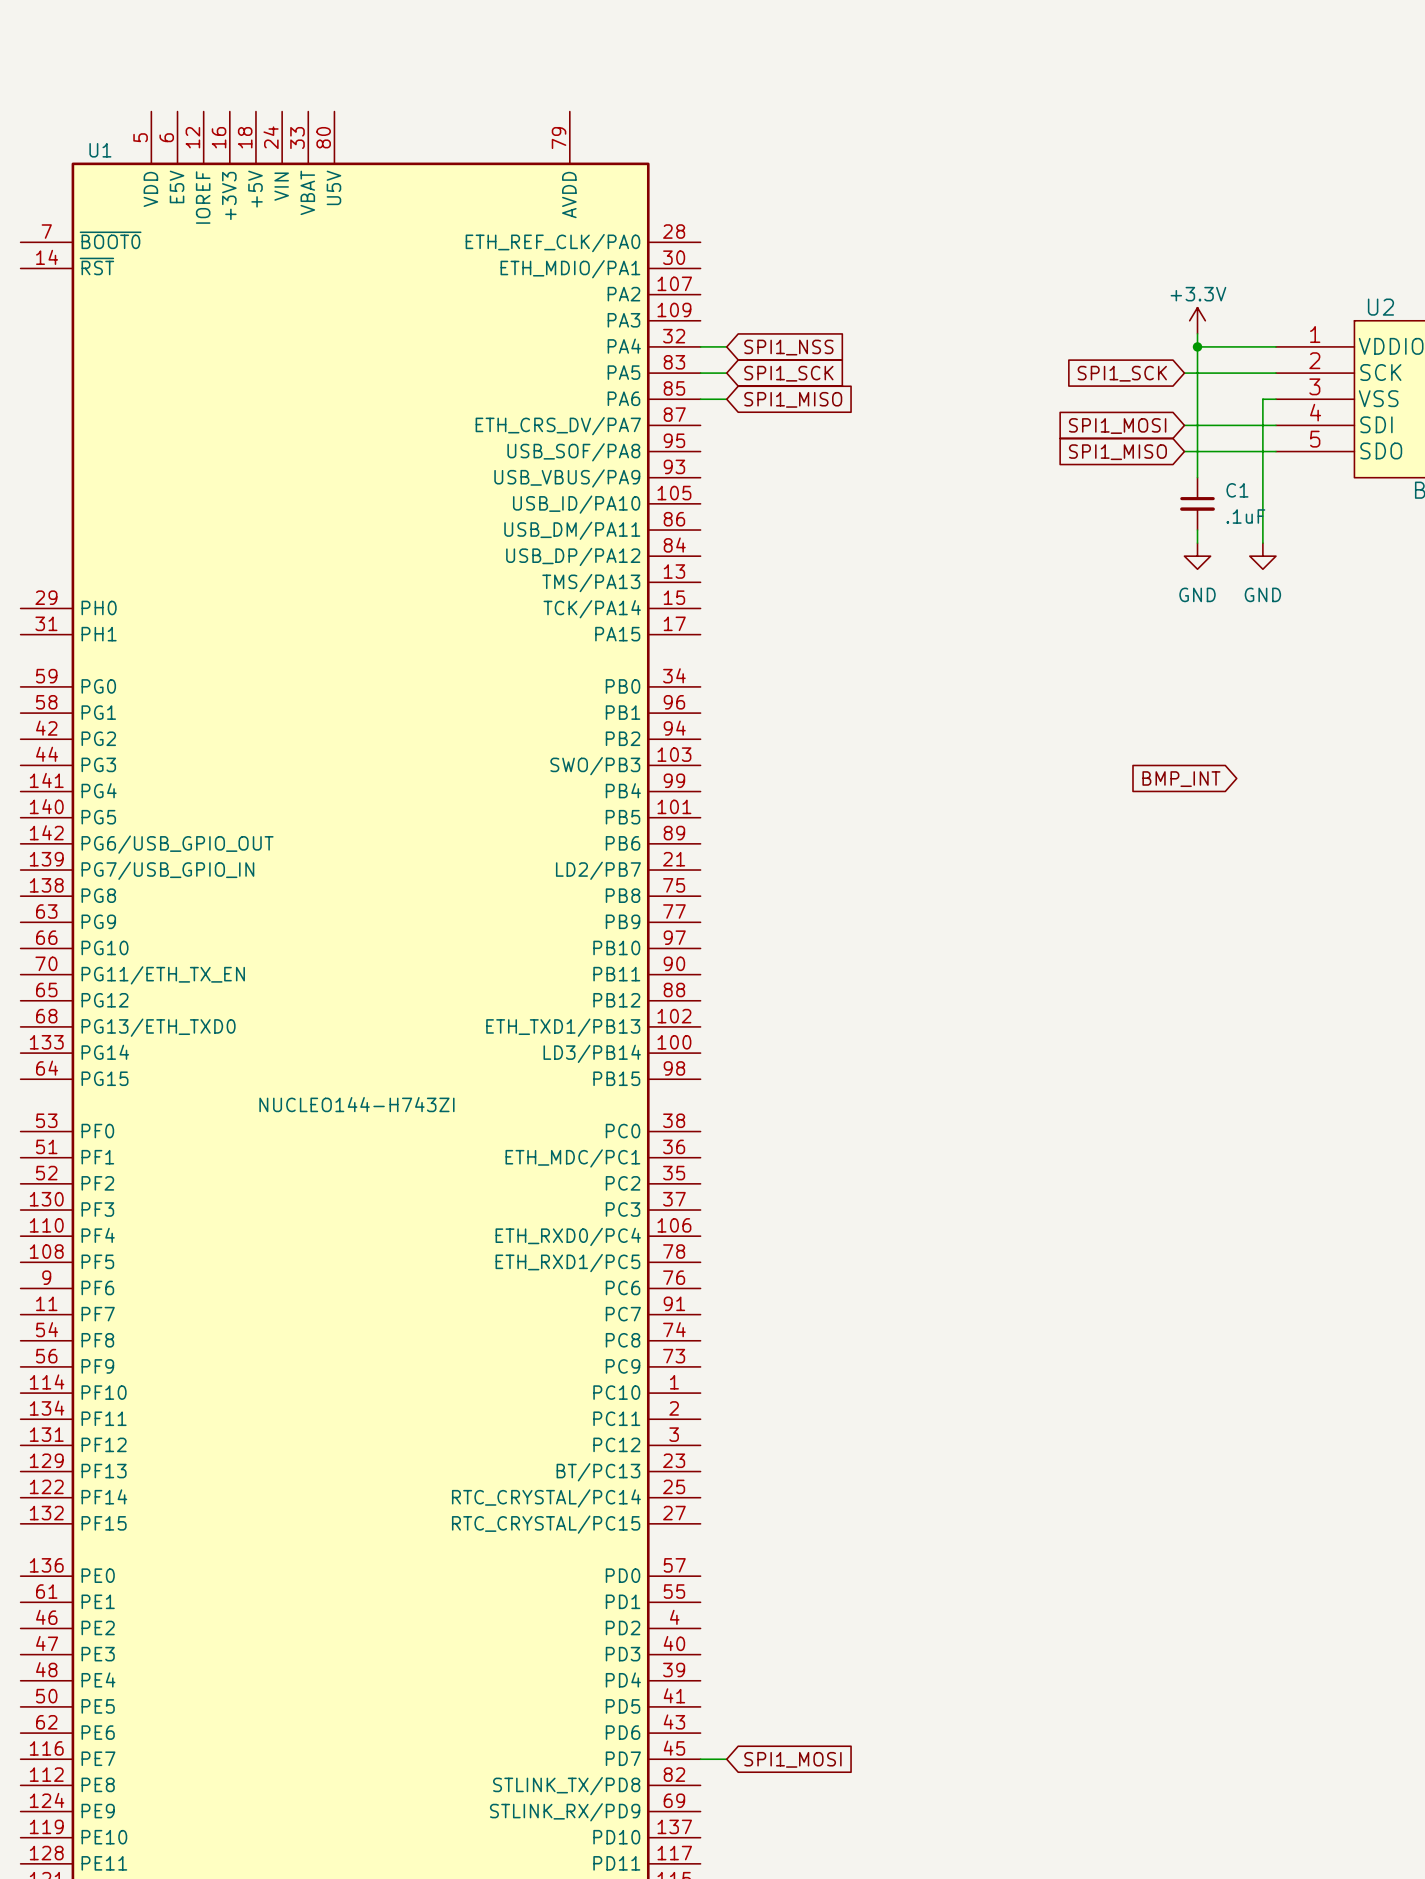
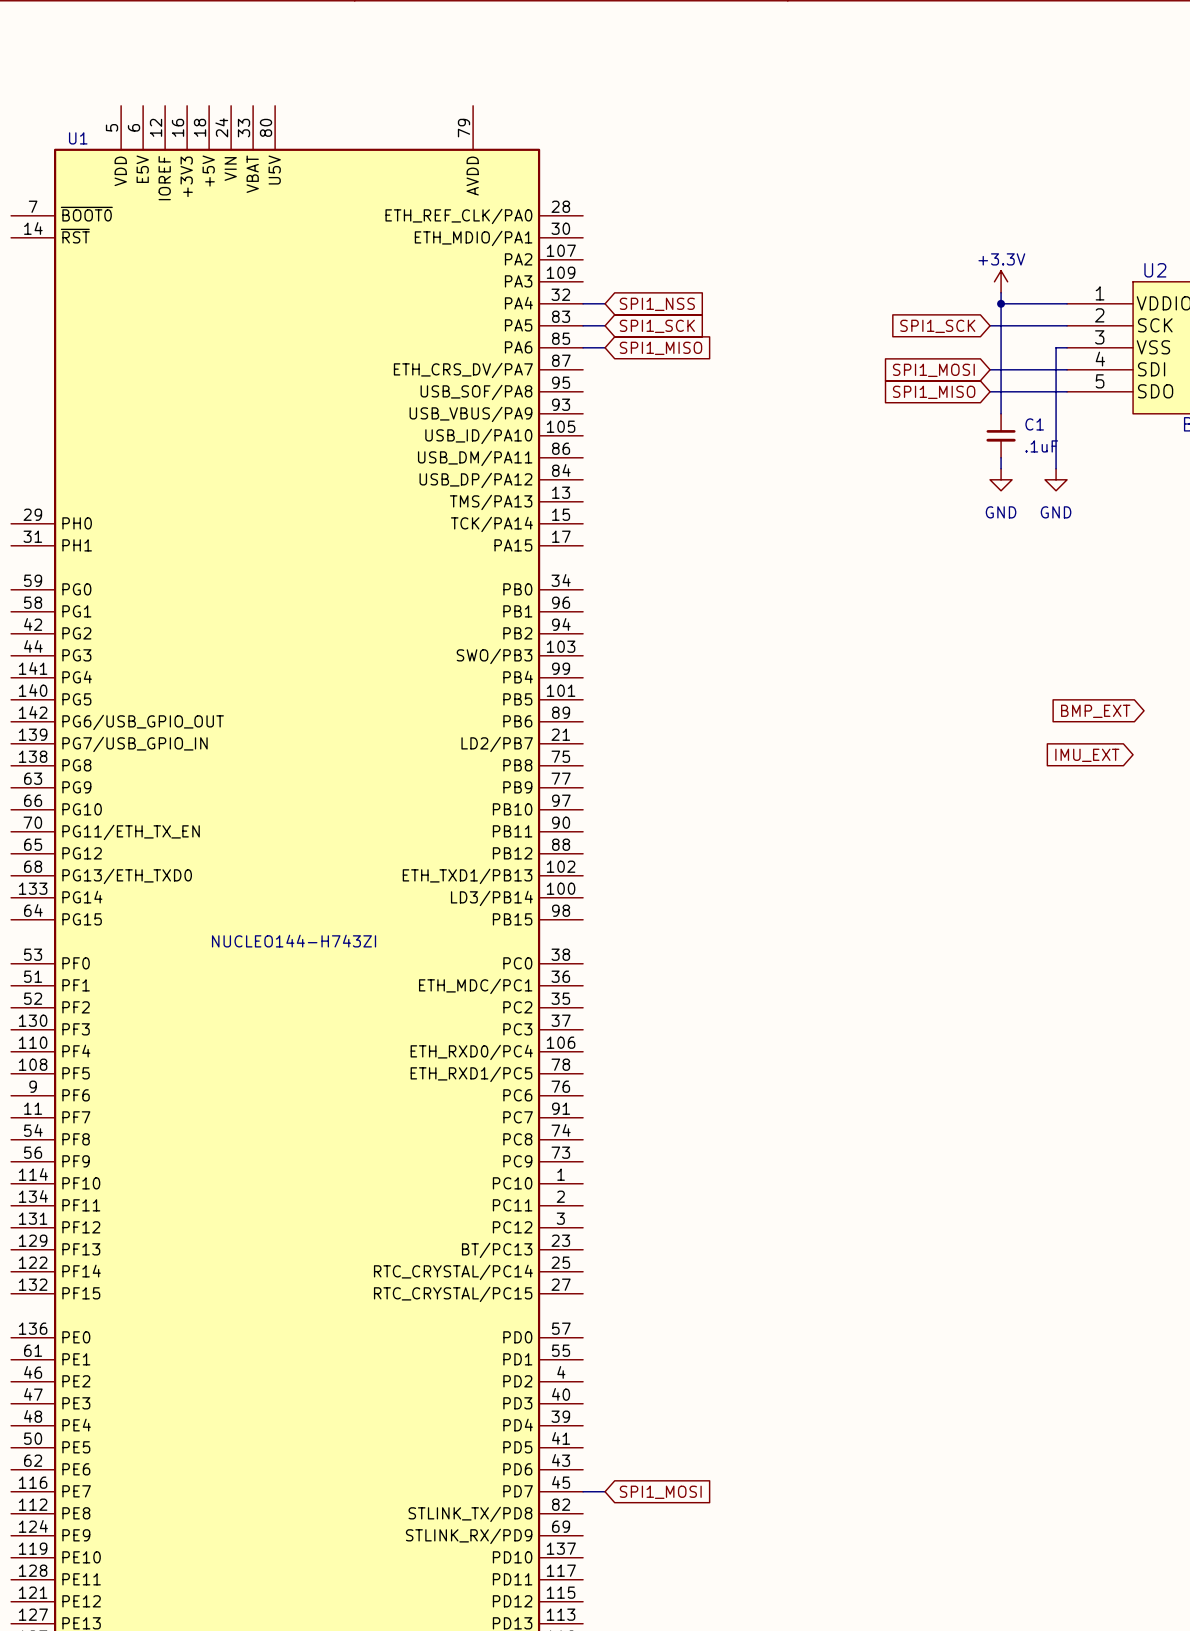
global label: BMP_INT (1181, 779) -> none
global label: none -> BMP_EXT (1095, 711)
global label: none -> IMU_EXT (1087, 755)

